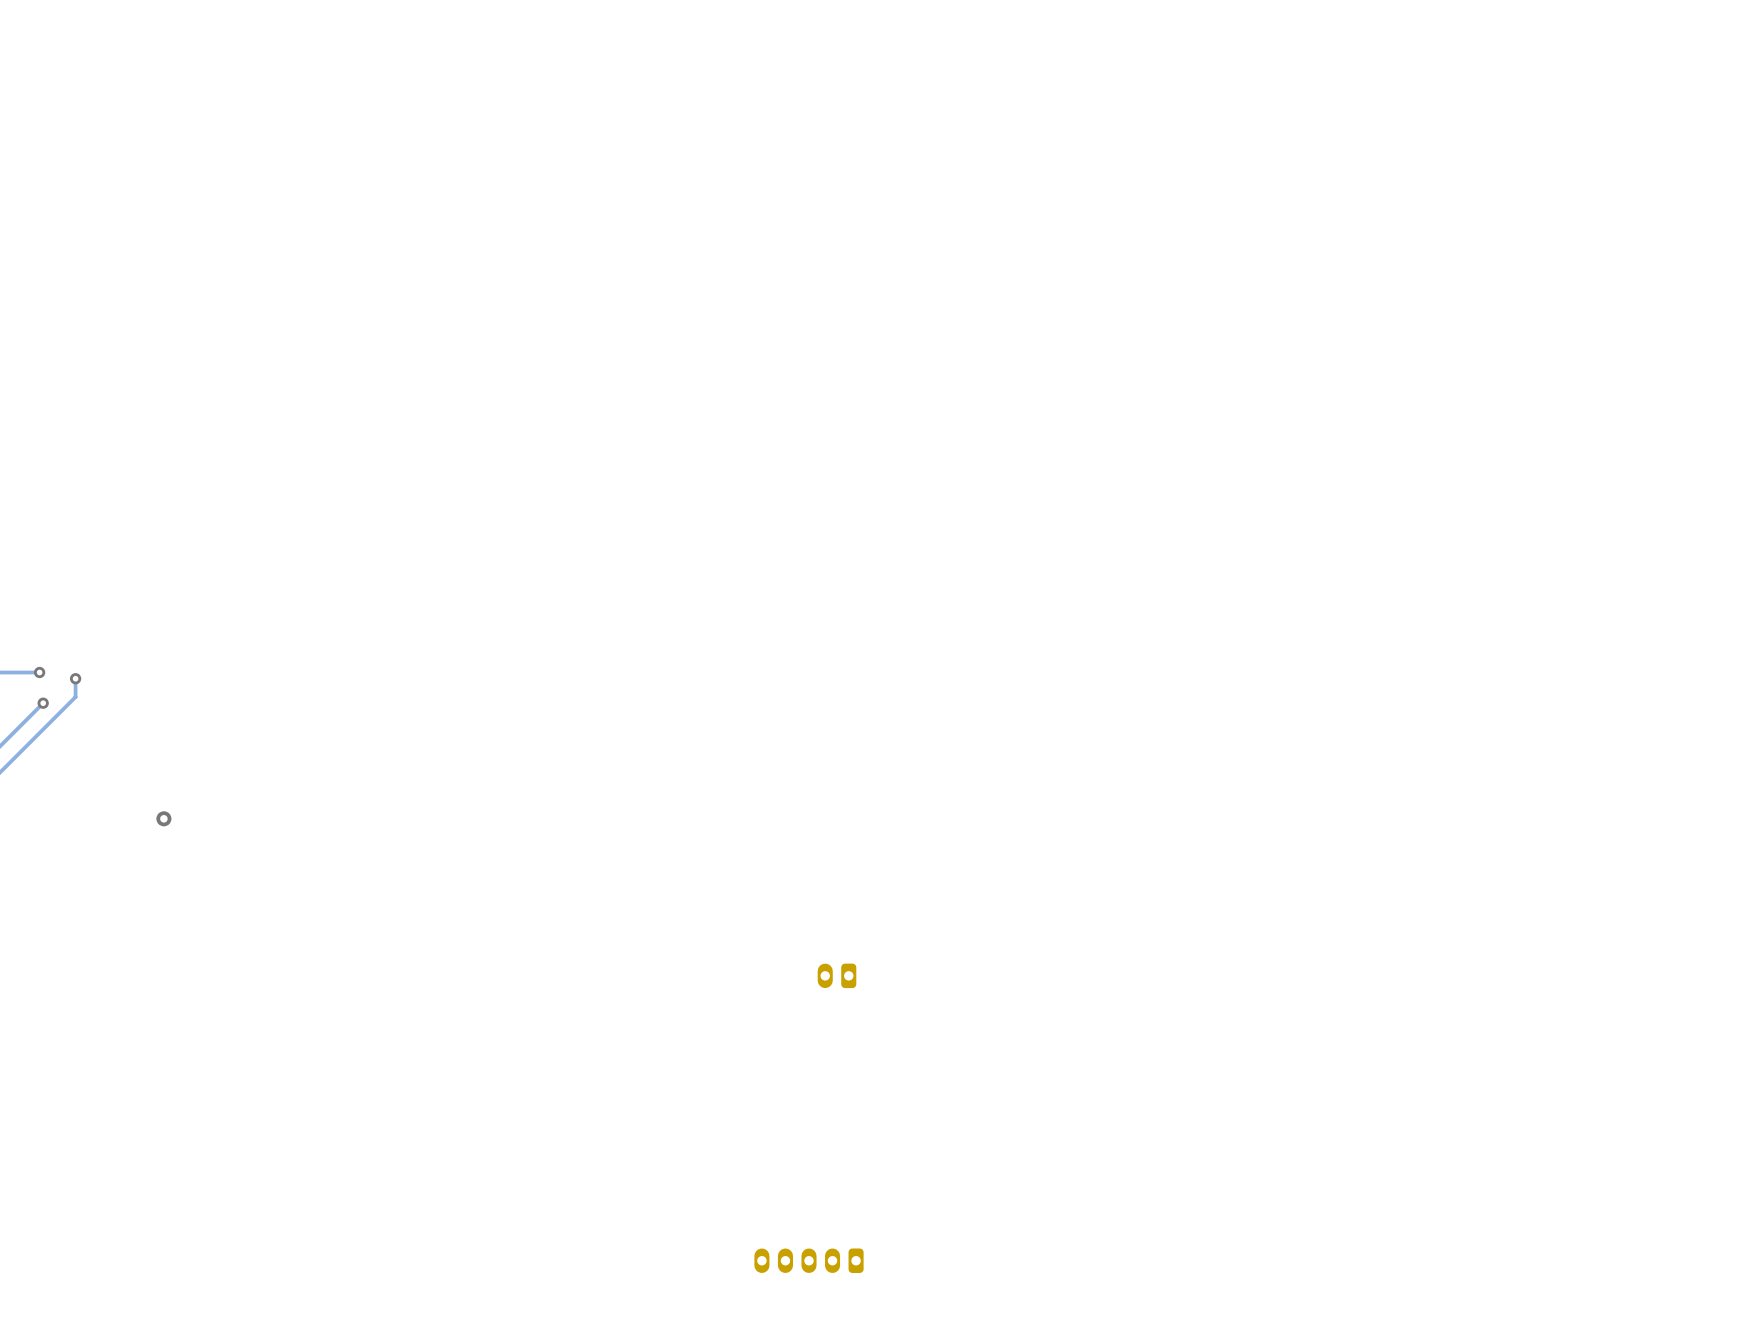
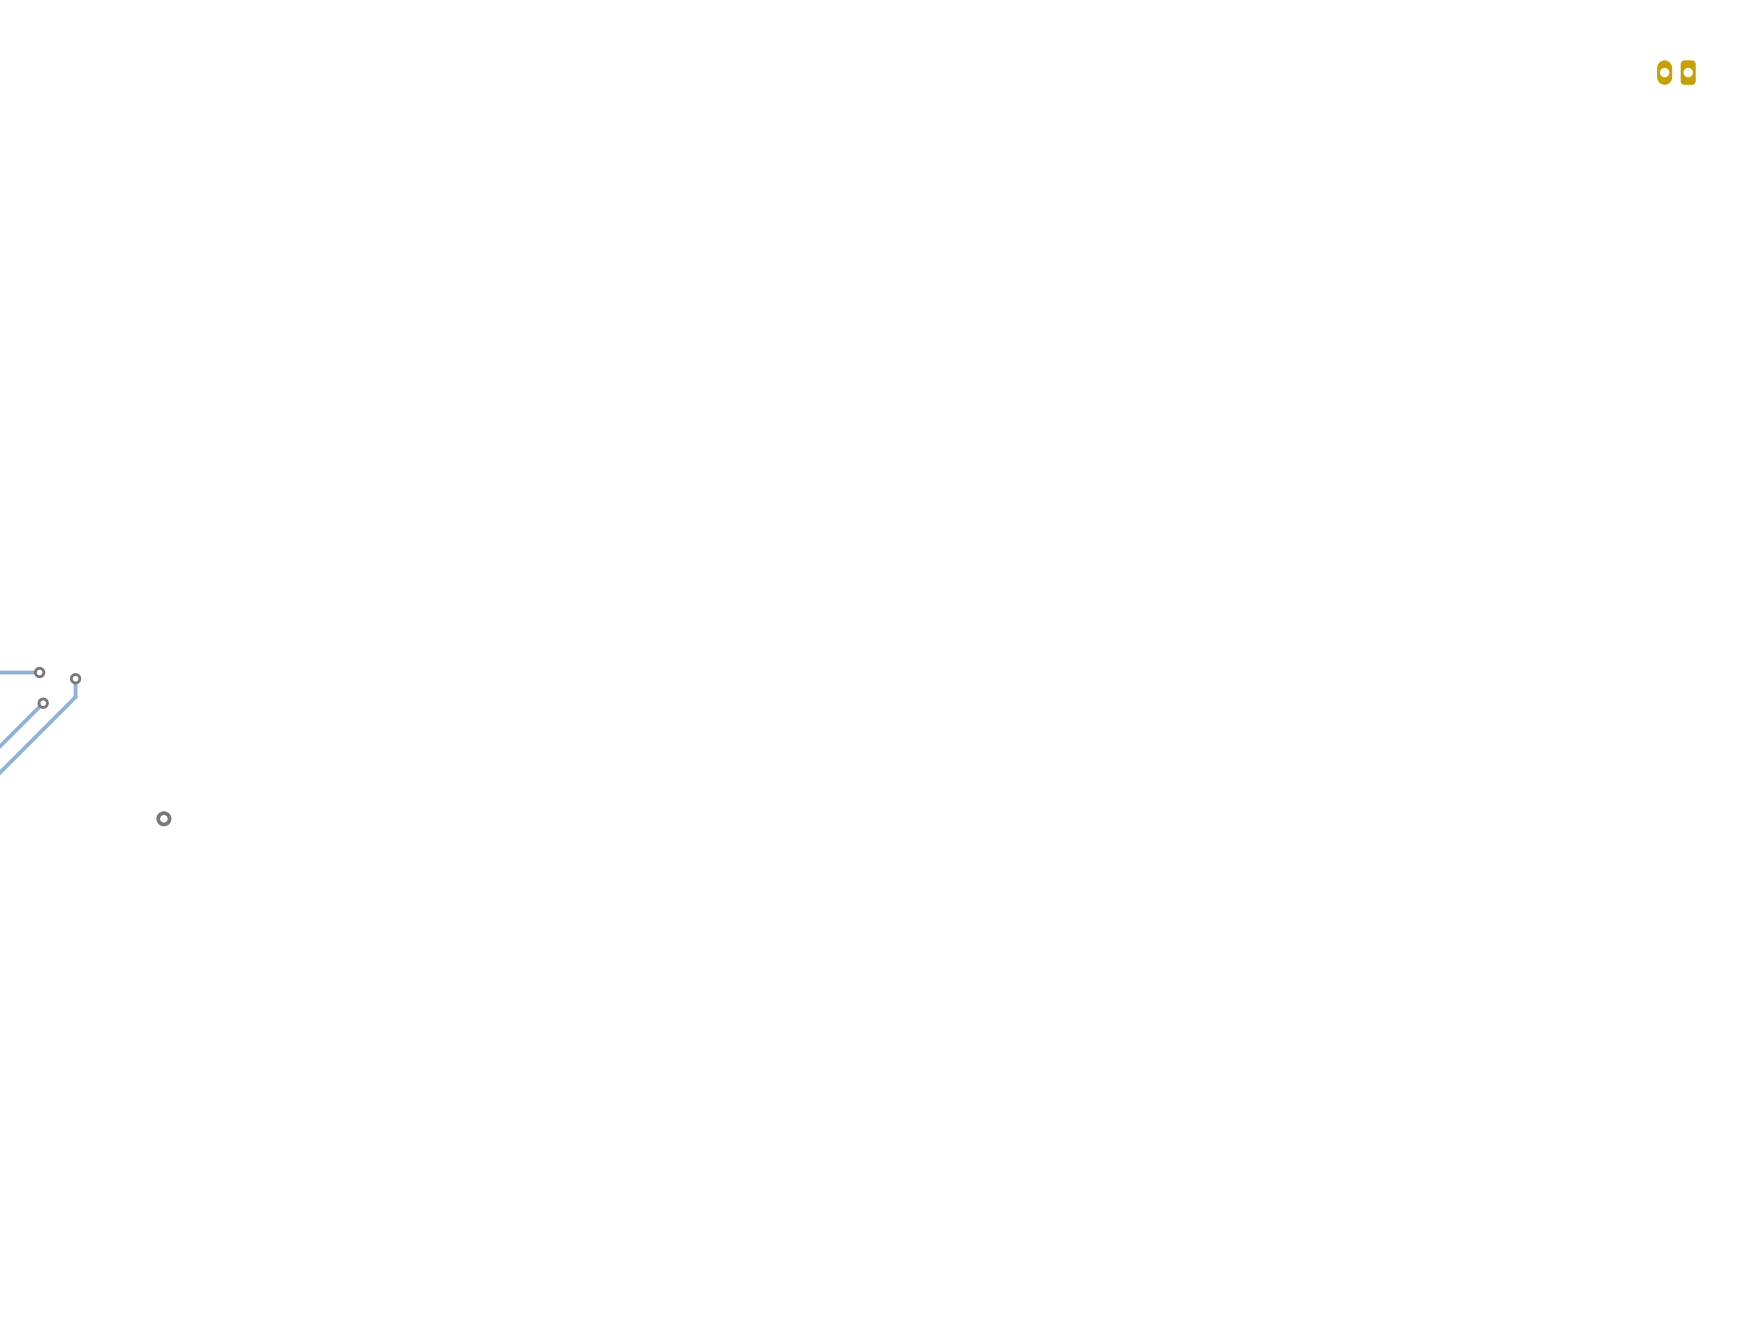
part: none -> (1676, 72)
part: (837, 975) -> none
part: (809, 1260) -> none

